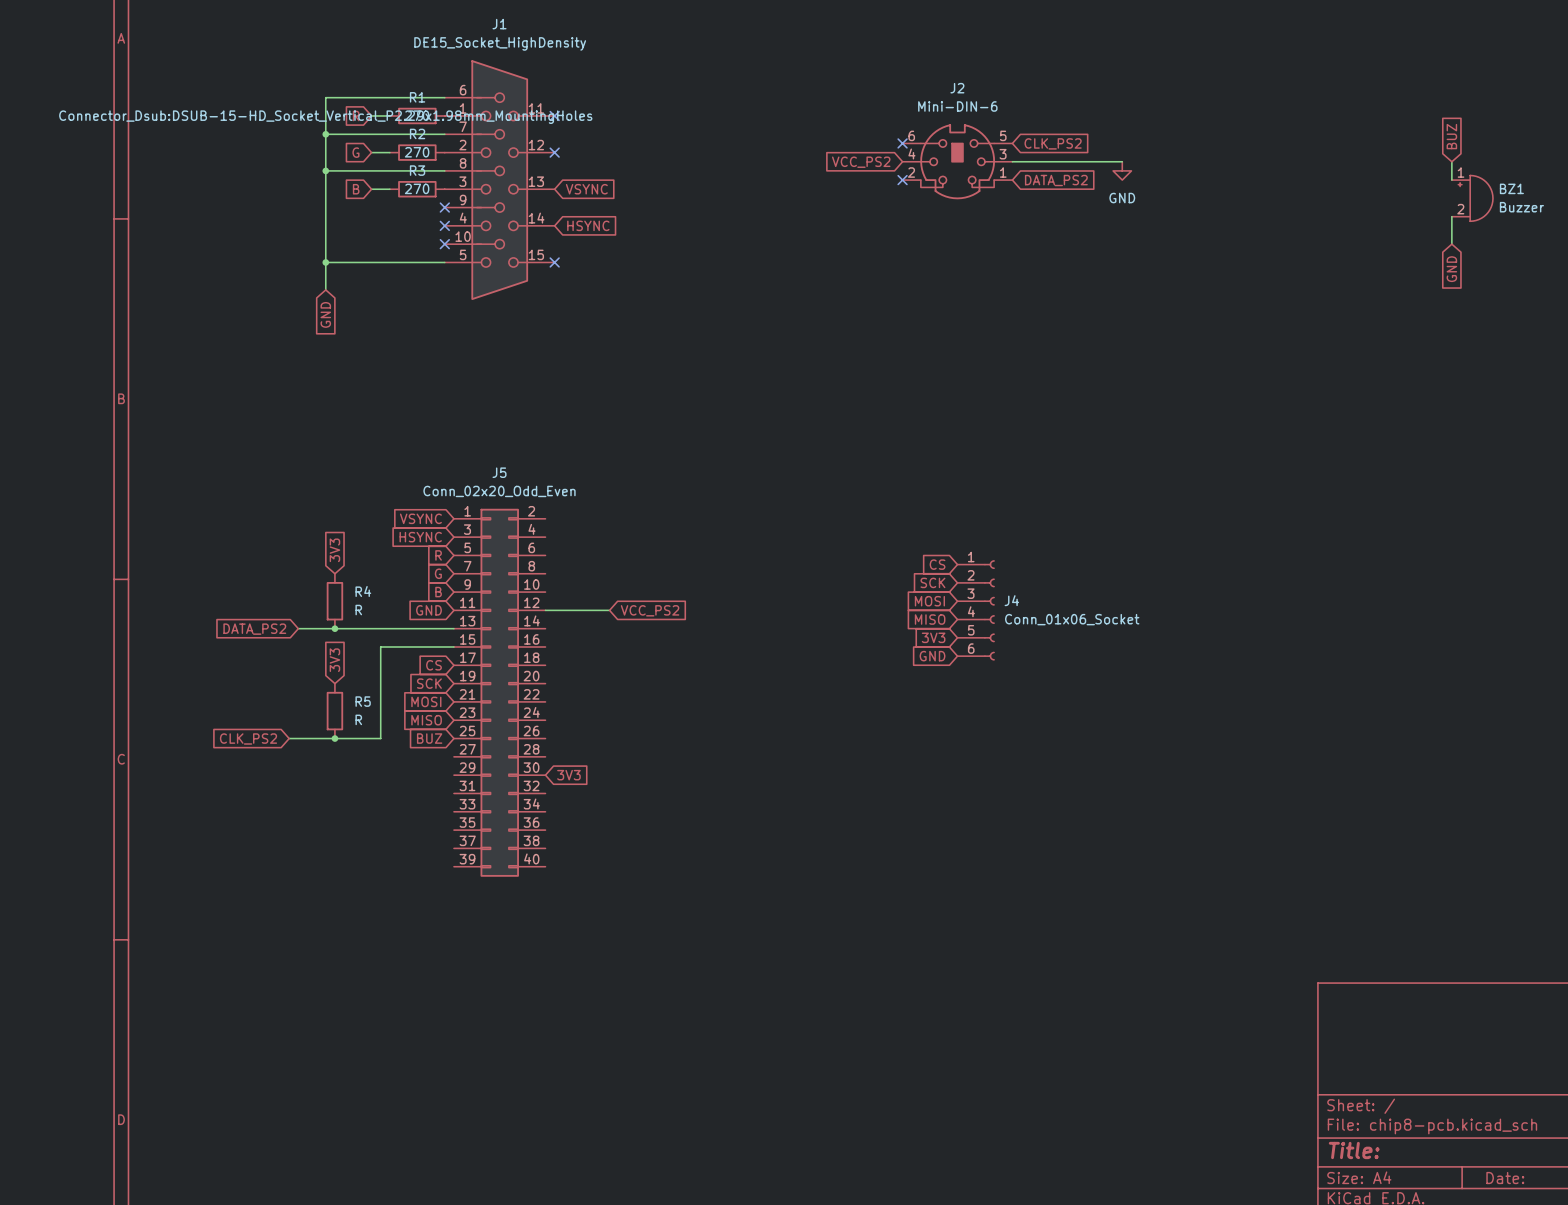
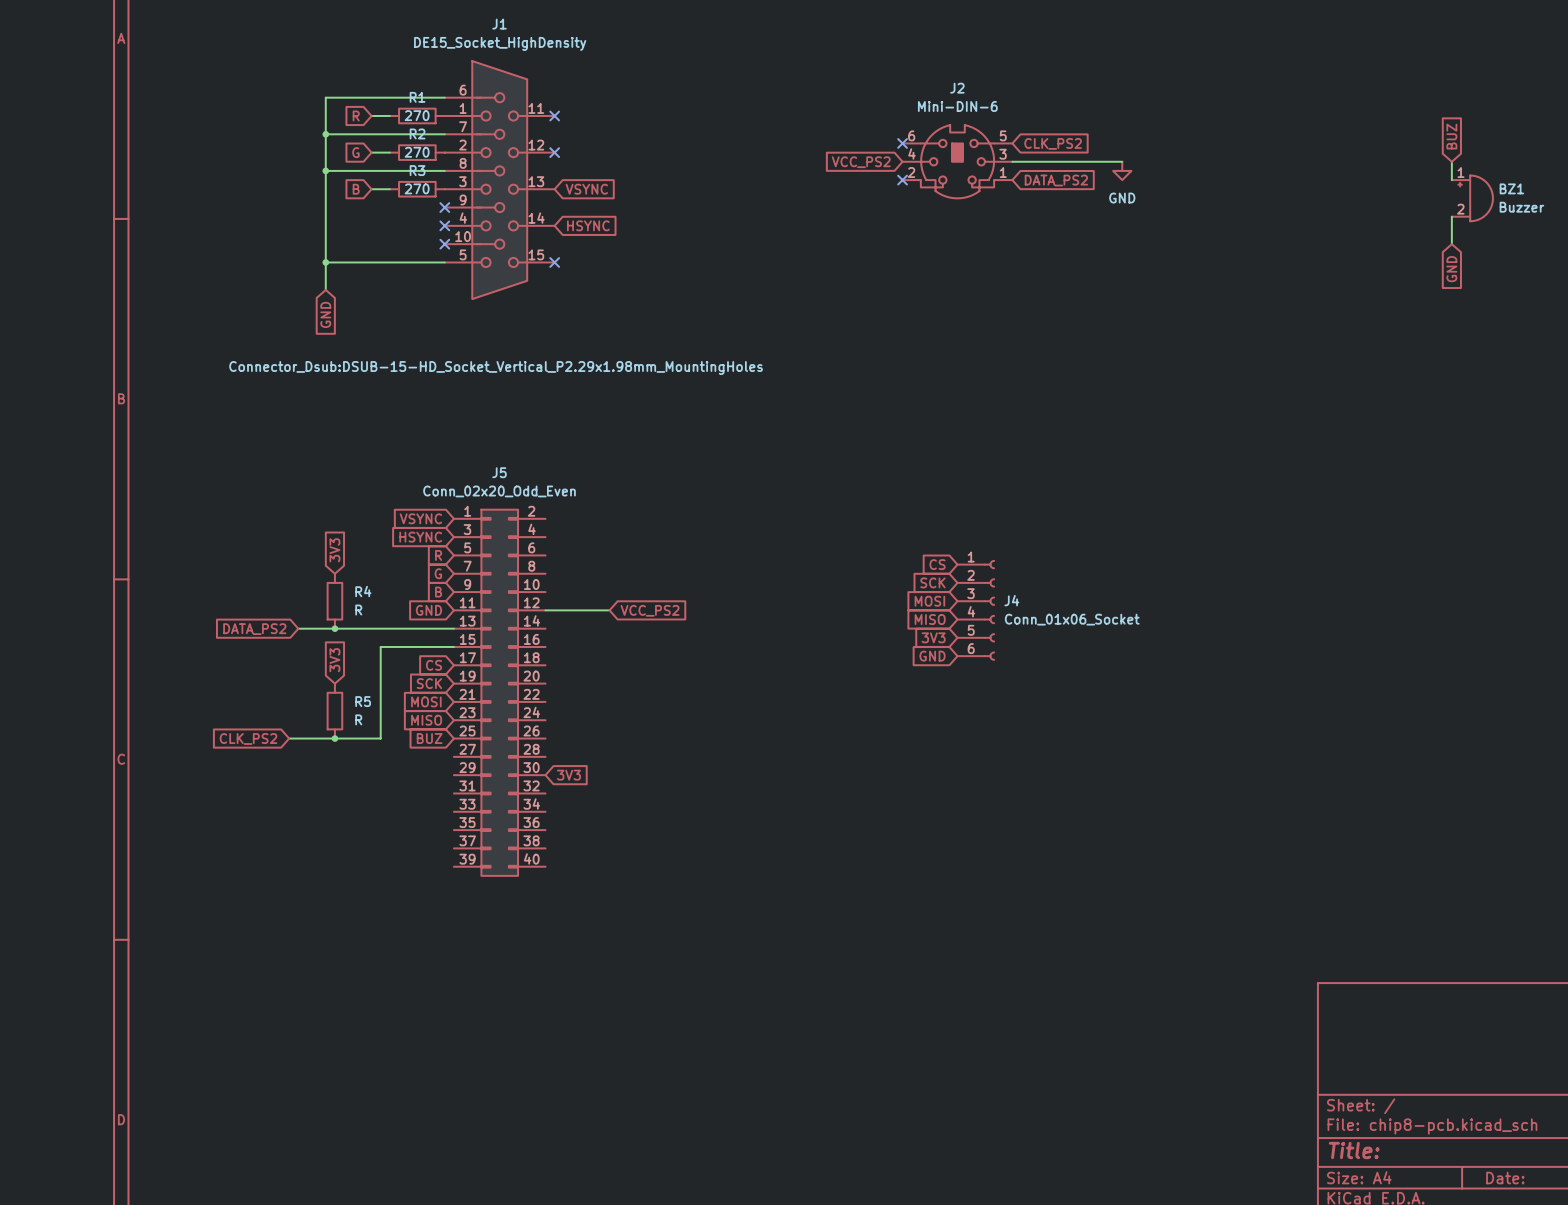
J1 text position: Connector_Dsub:DSUB-15-HD_Socket_Vertical_P2.29x1.98mm_MountingHoles (325, 117) -> Connector_Dsub:DSUB-15-HD_Socket_Vertical_P2.29x1.98mm_MountingHoles (496, 368)

